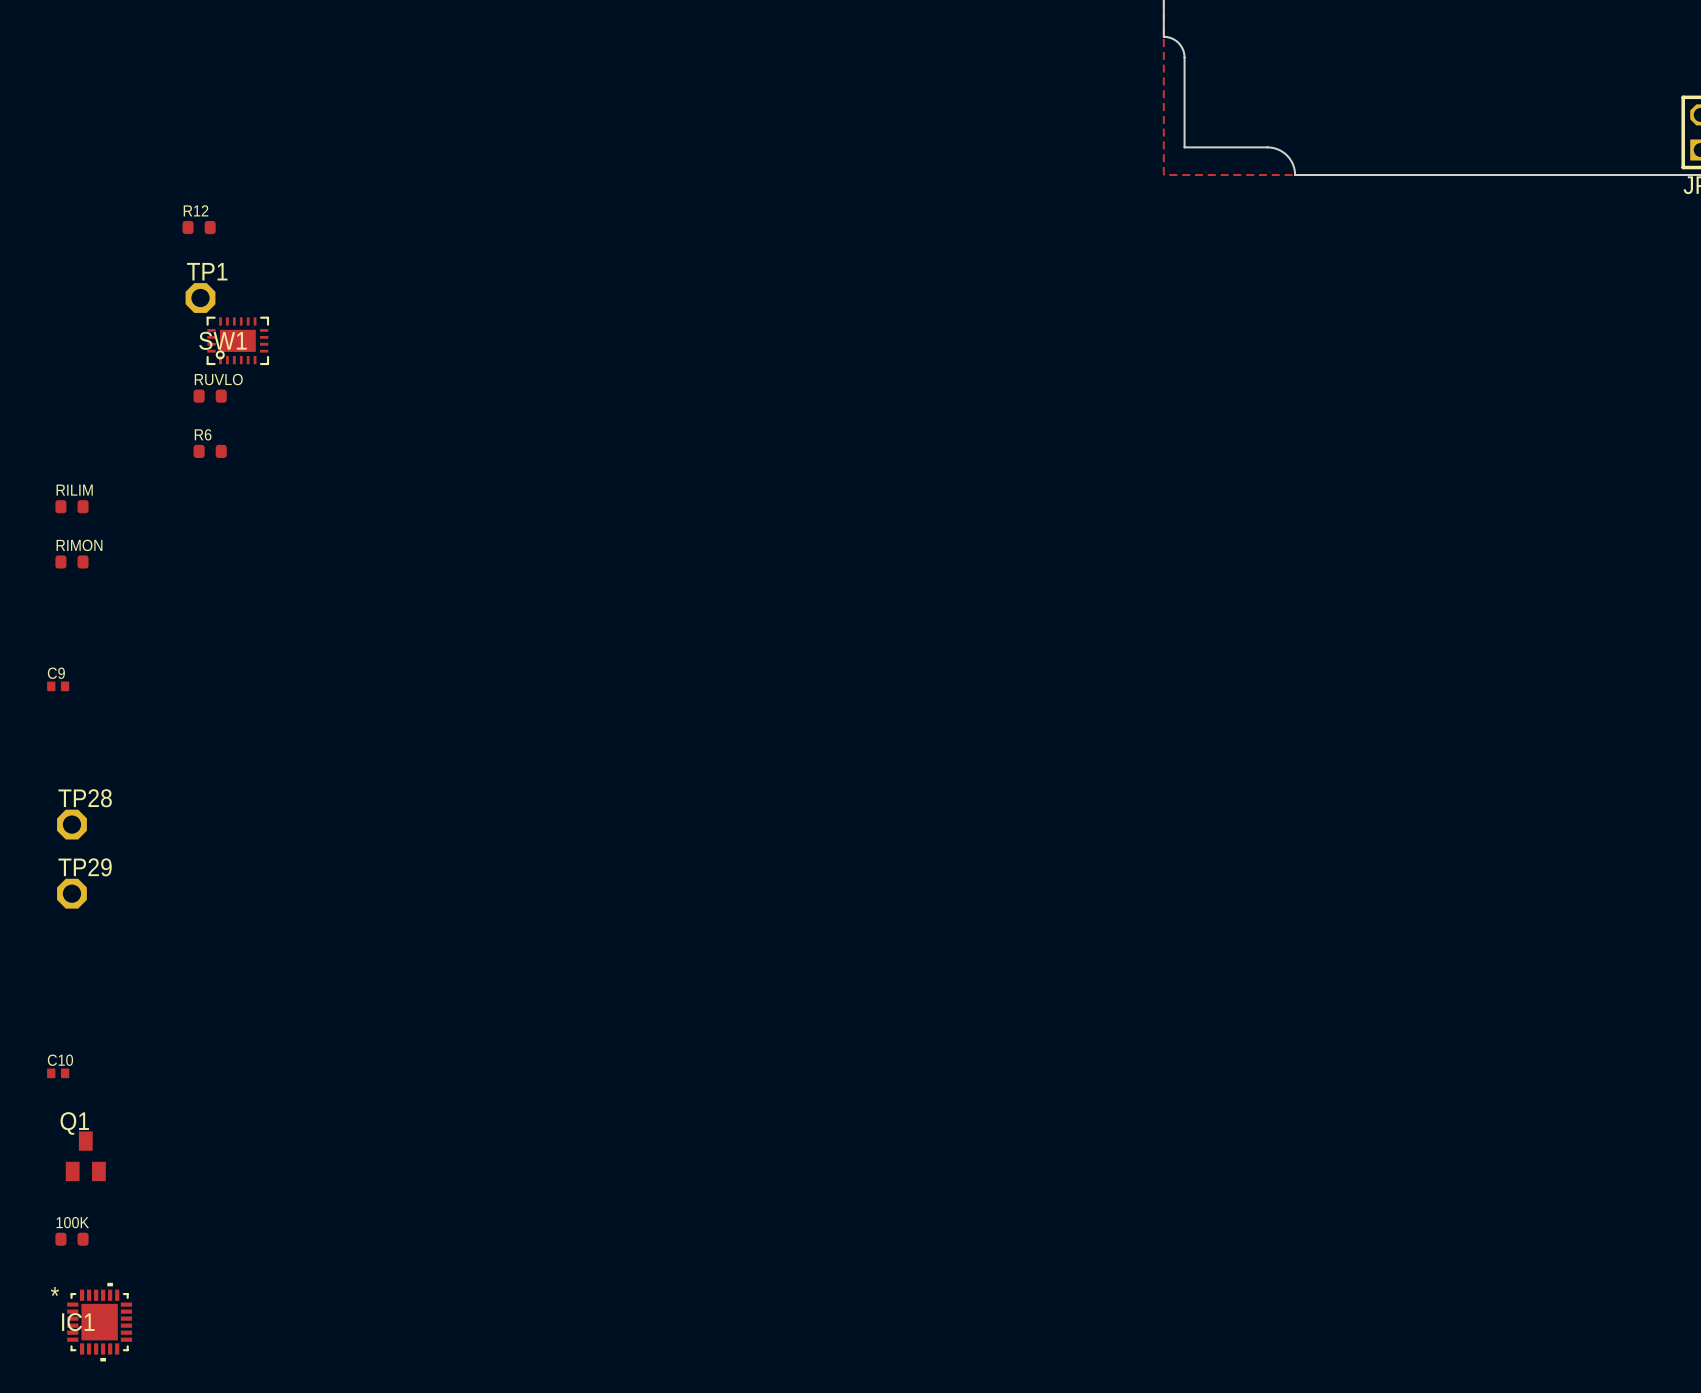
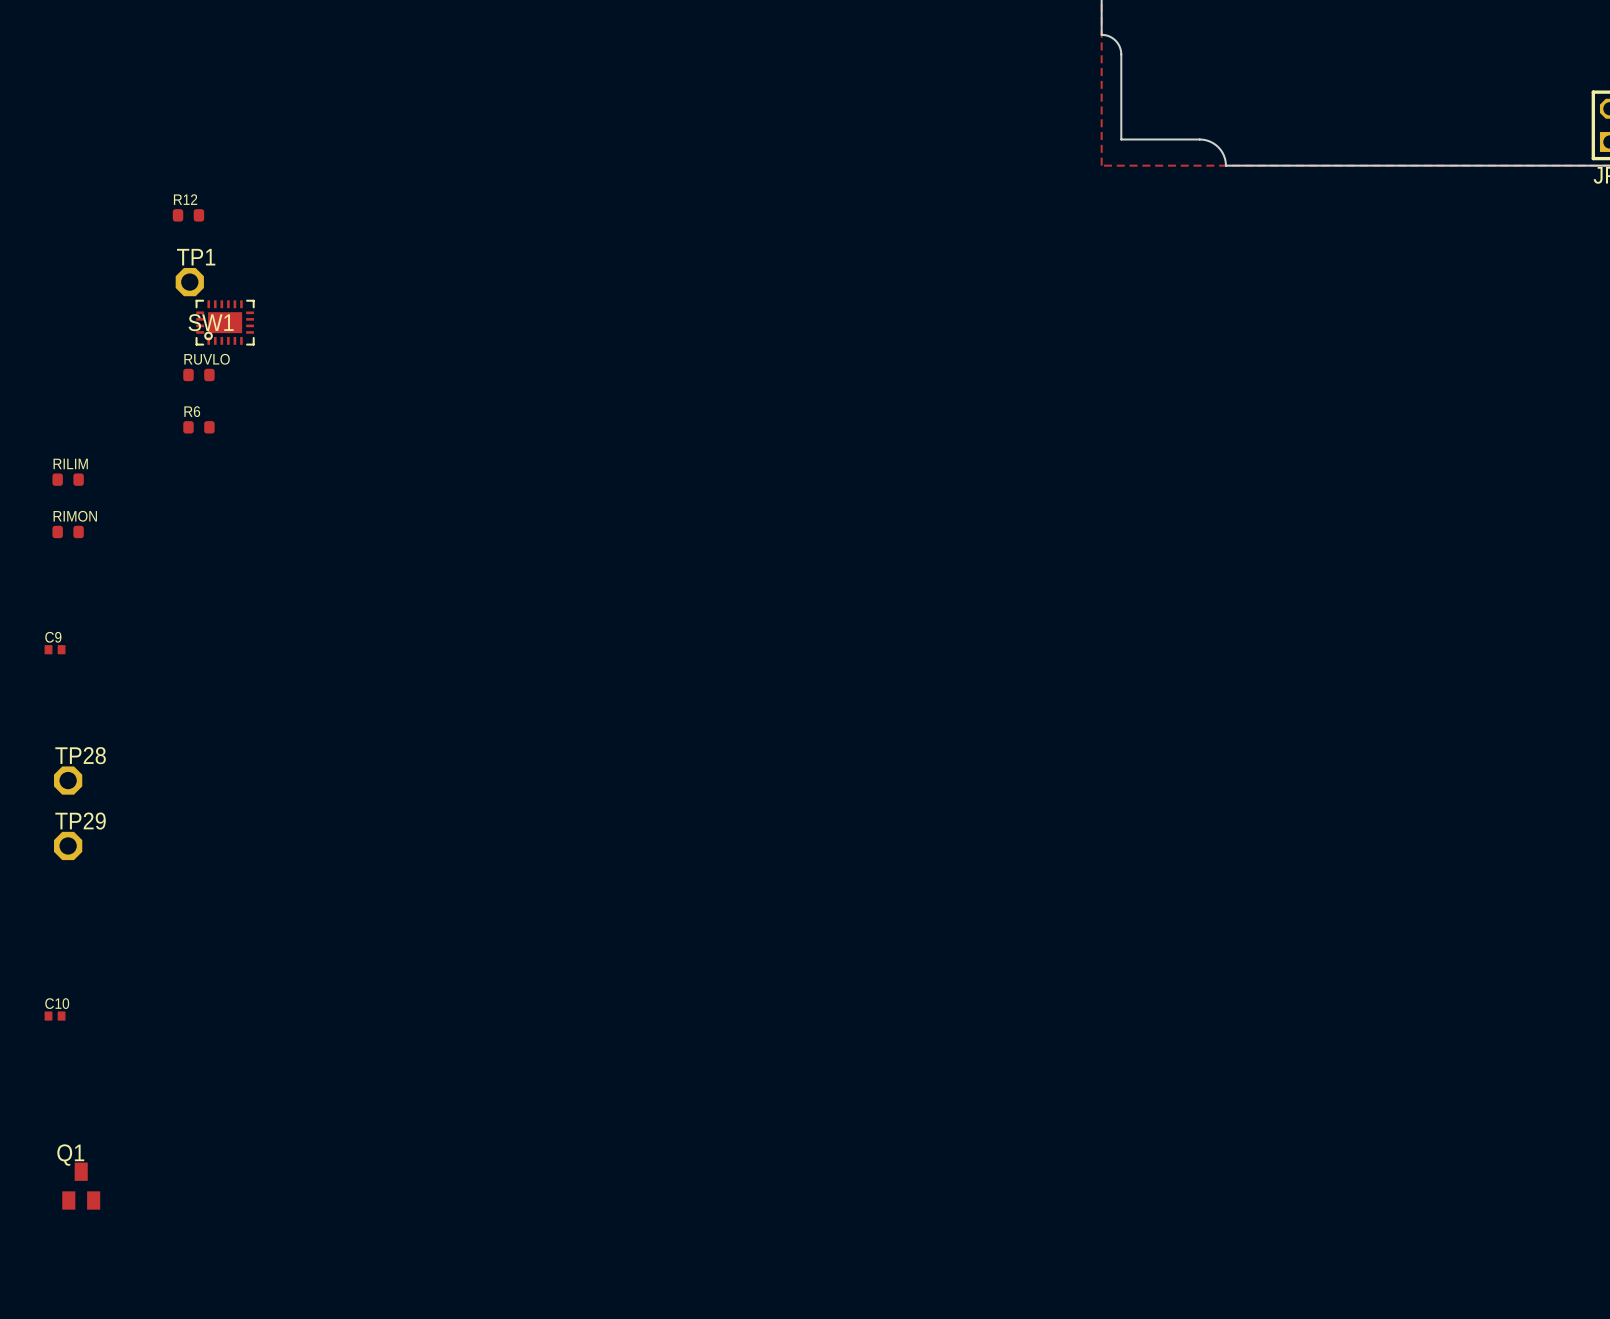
Q1 position: (85, 1156) -> (81, 1186)
100K: (71, 1239) -> none
IC1: (99, 1322) -> none

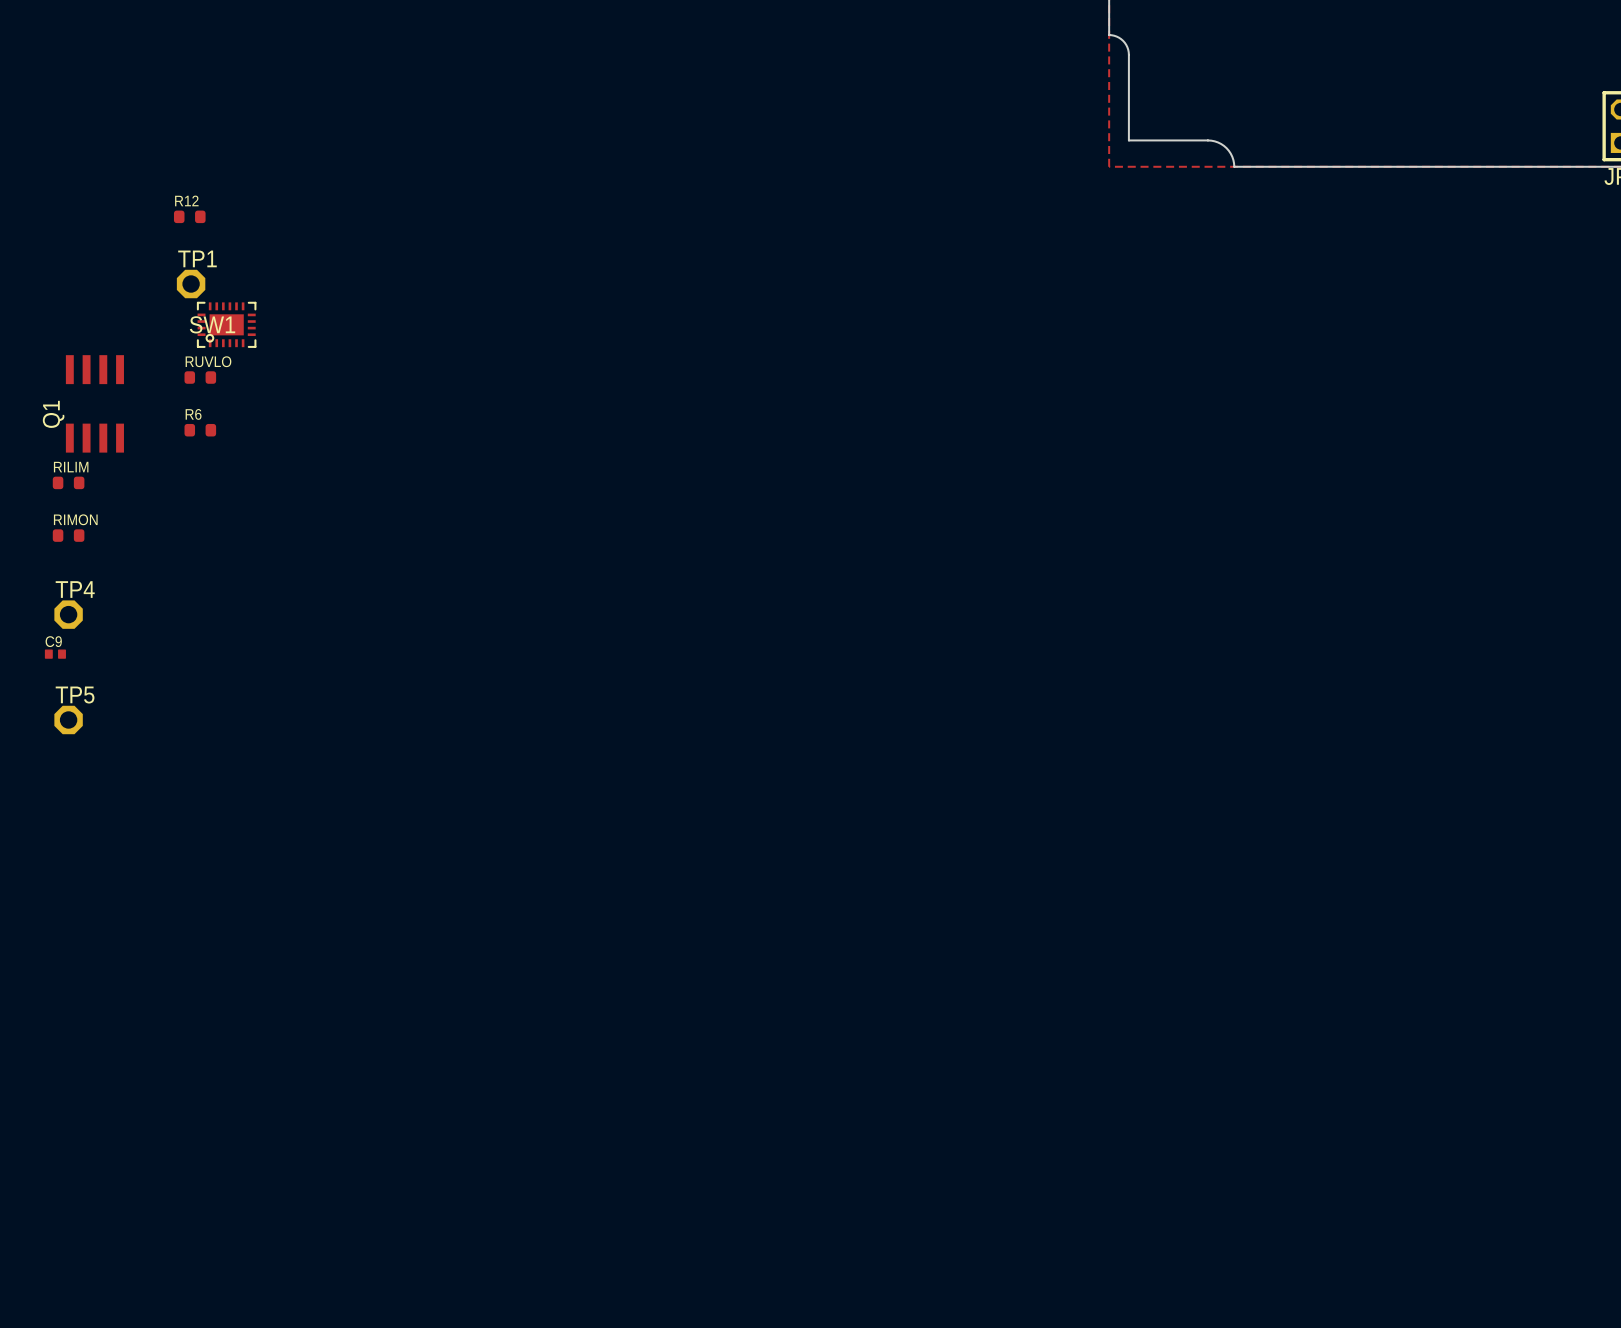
TP4: none -> (68, 614)
TP5: none -> (68, 719)
TP28: (68, 780) -> none
TP29: (68, 845) -> none
C10: (55, 1016) -> none
Q1 name position: Q1 (70, 1155) -> Q1 (53, 414)
Q1 footprint: [62, 1162, 101, 1210] -> [65, 355, 124, 453]

